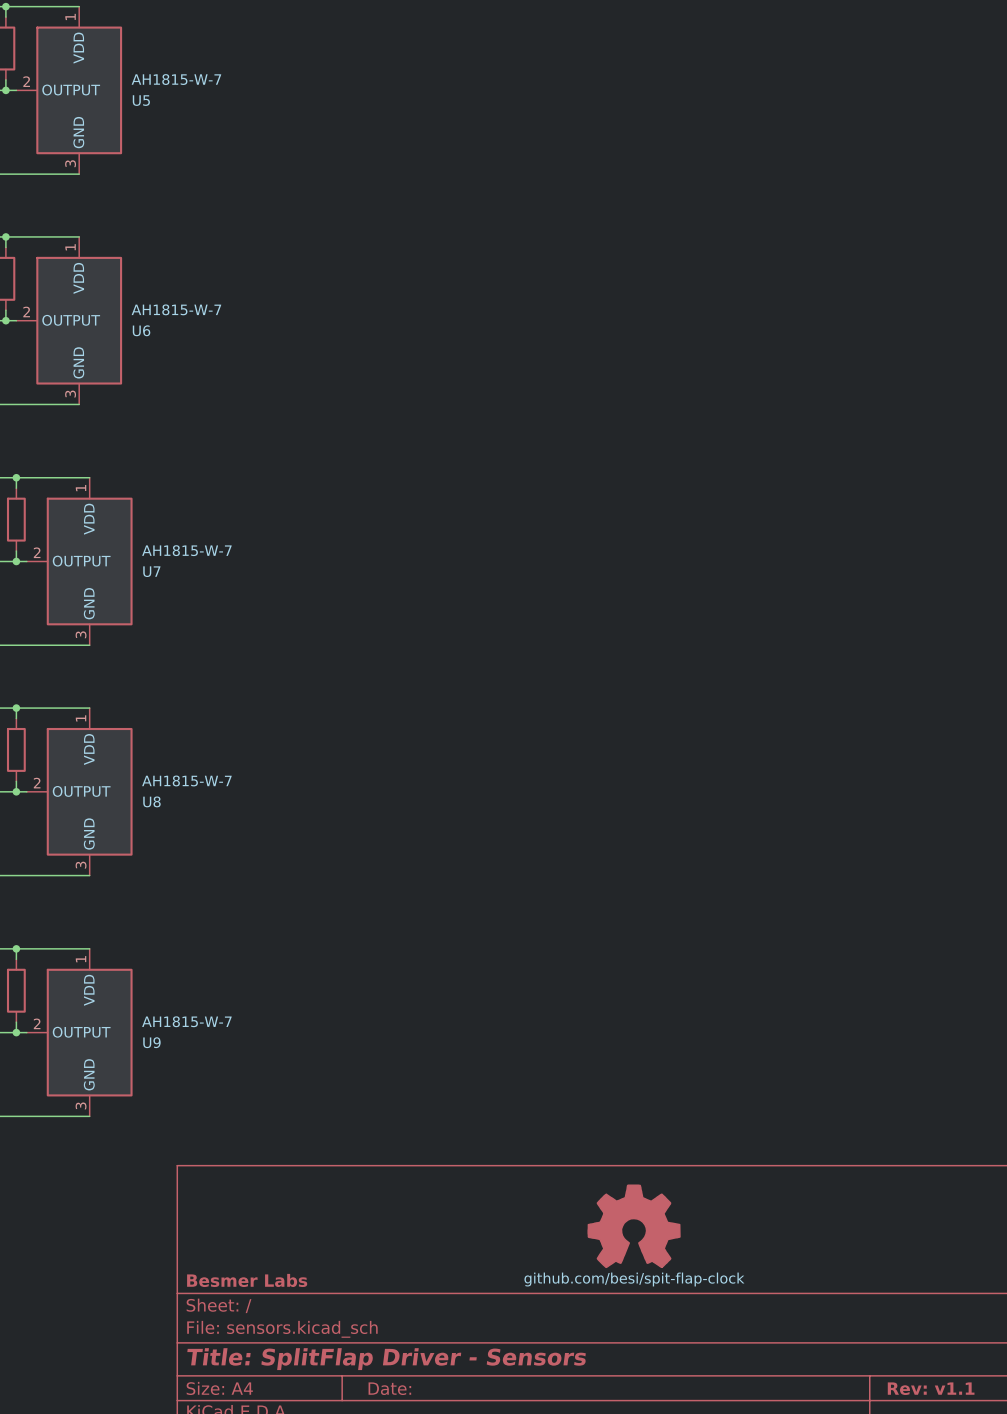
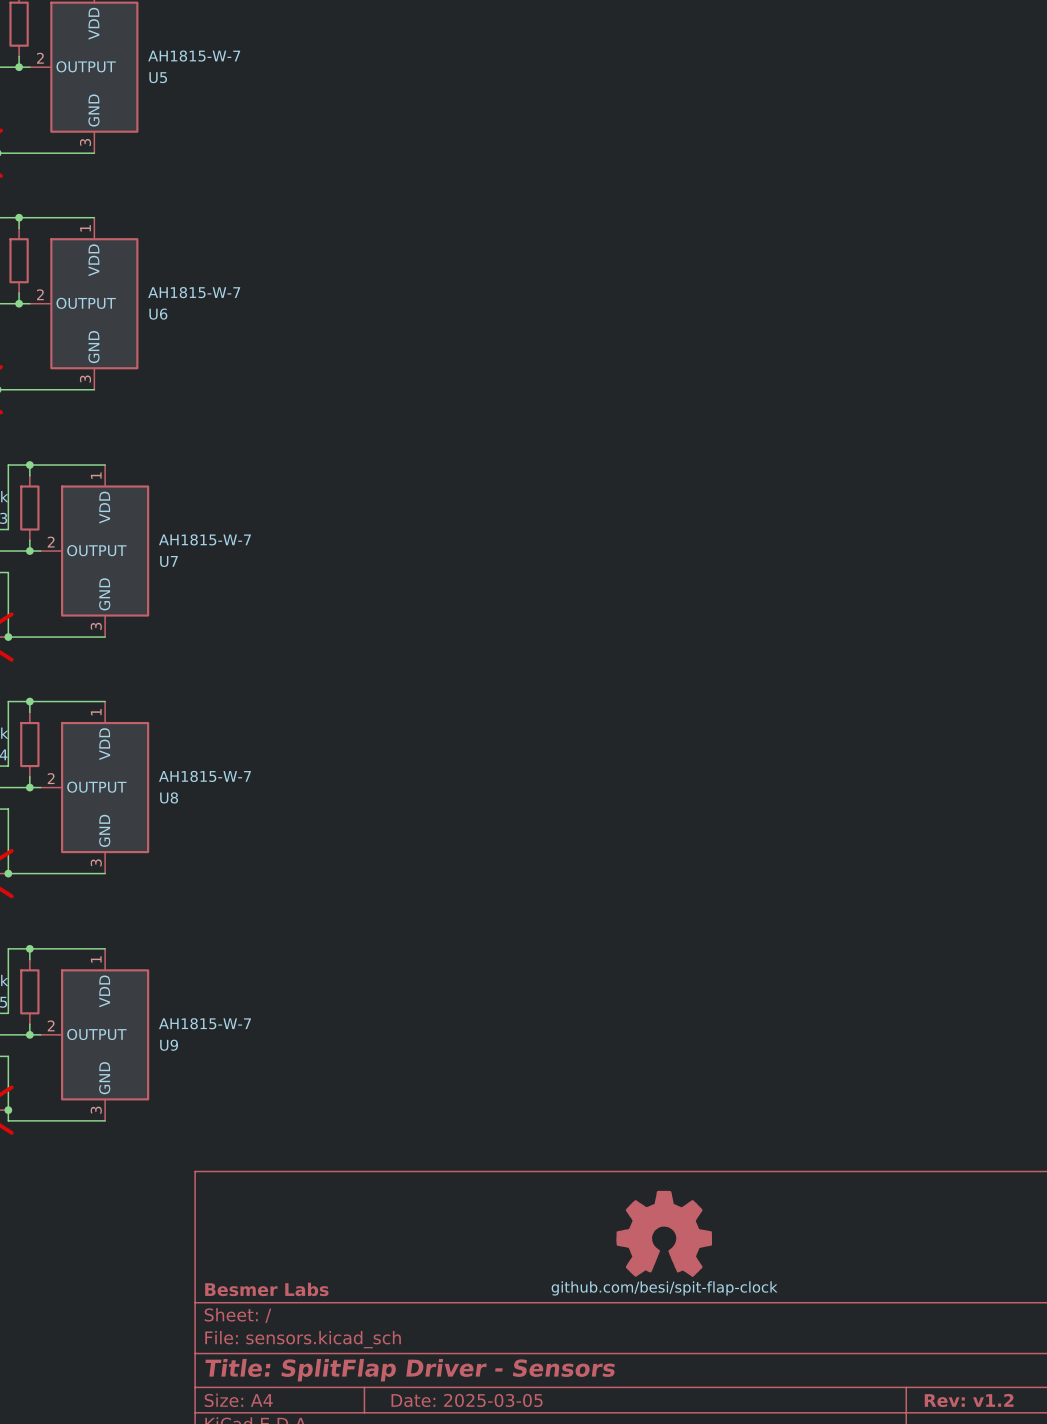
title block: Date: (389, 1388) -> Date: 2025-03-05 (467, 1400)
title block: Rev: v1.1 (931, 1388) -> Rev: v1.2 (969, 1400)

